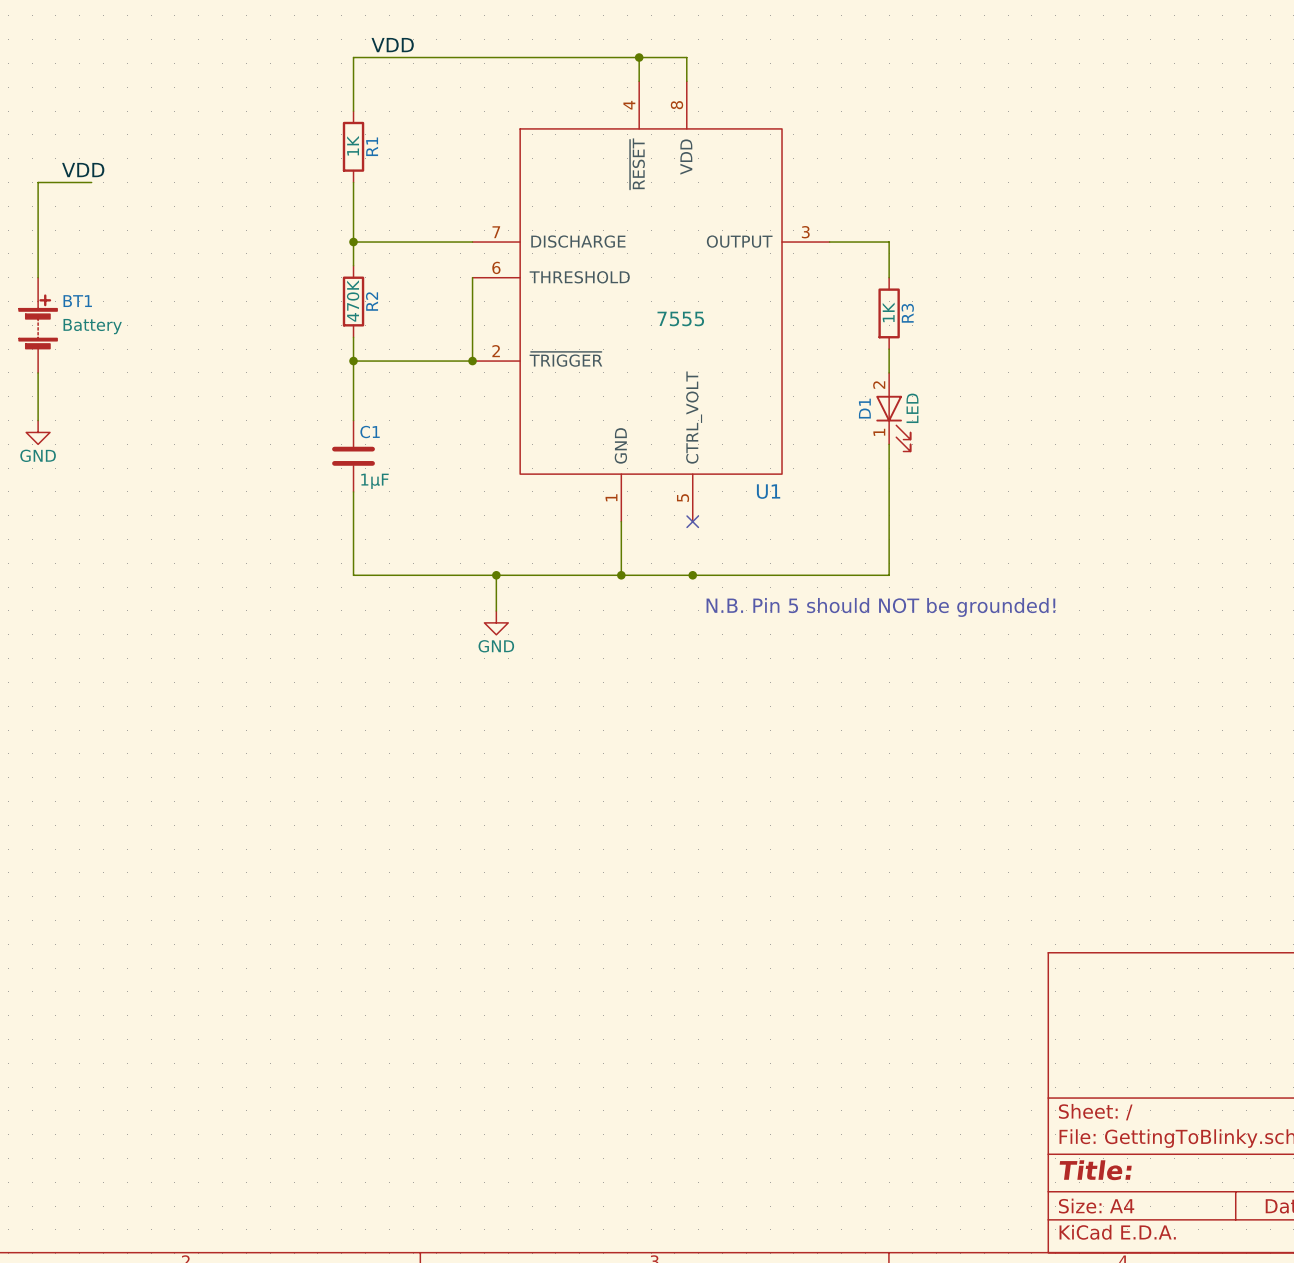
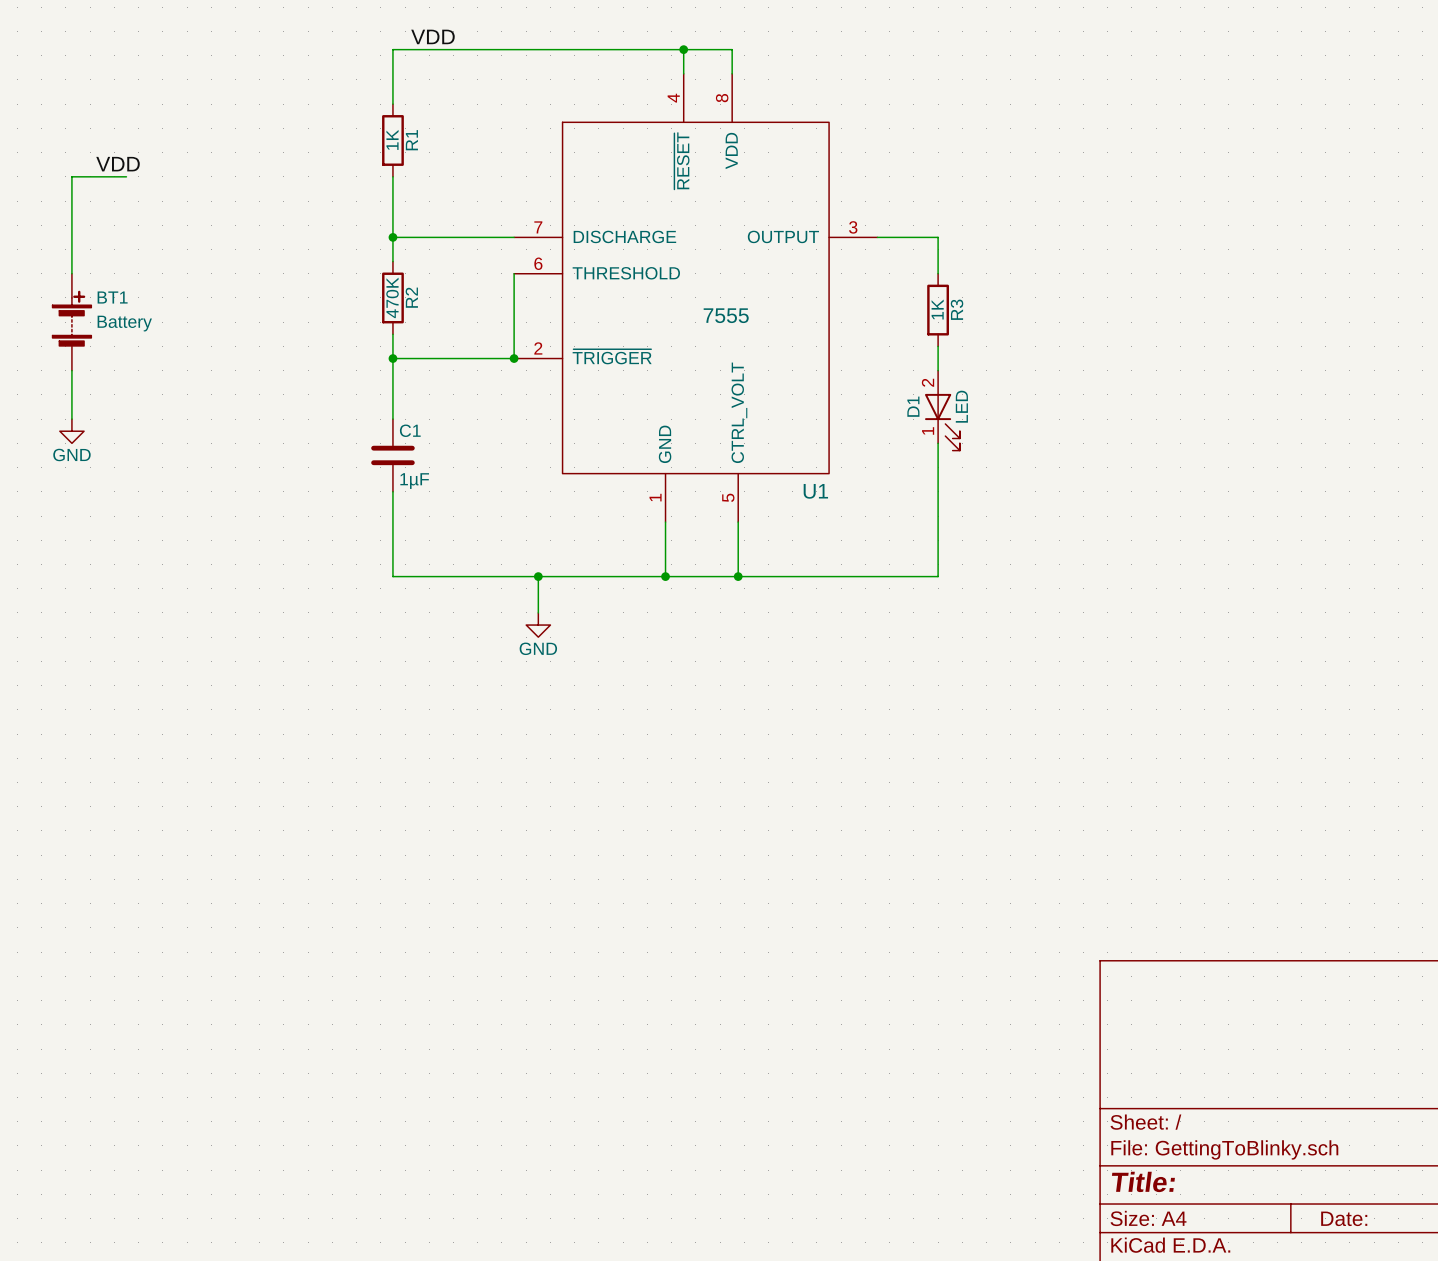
wire: none -> (738, 522) (738, 576)
no-connect mark: (692, 521) -> none
text: N.B. Pin 5 should NOT be grounded! (880, 607) -> none

